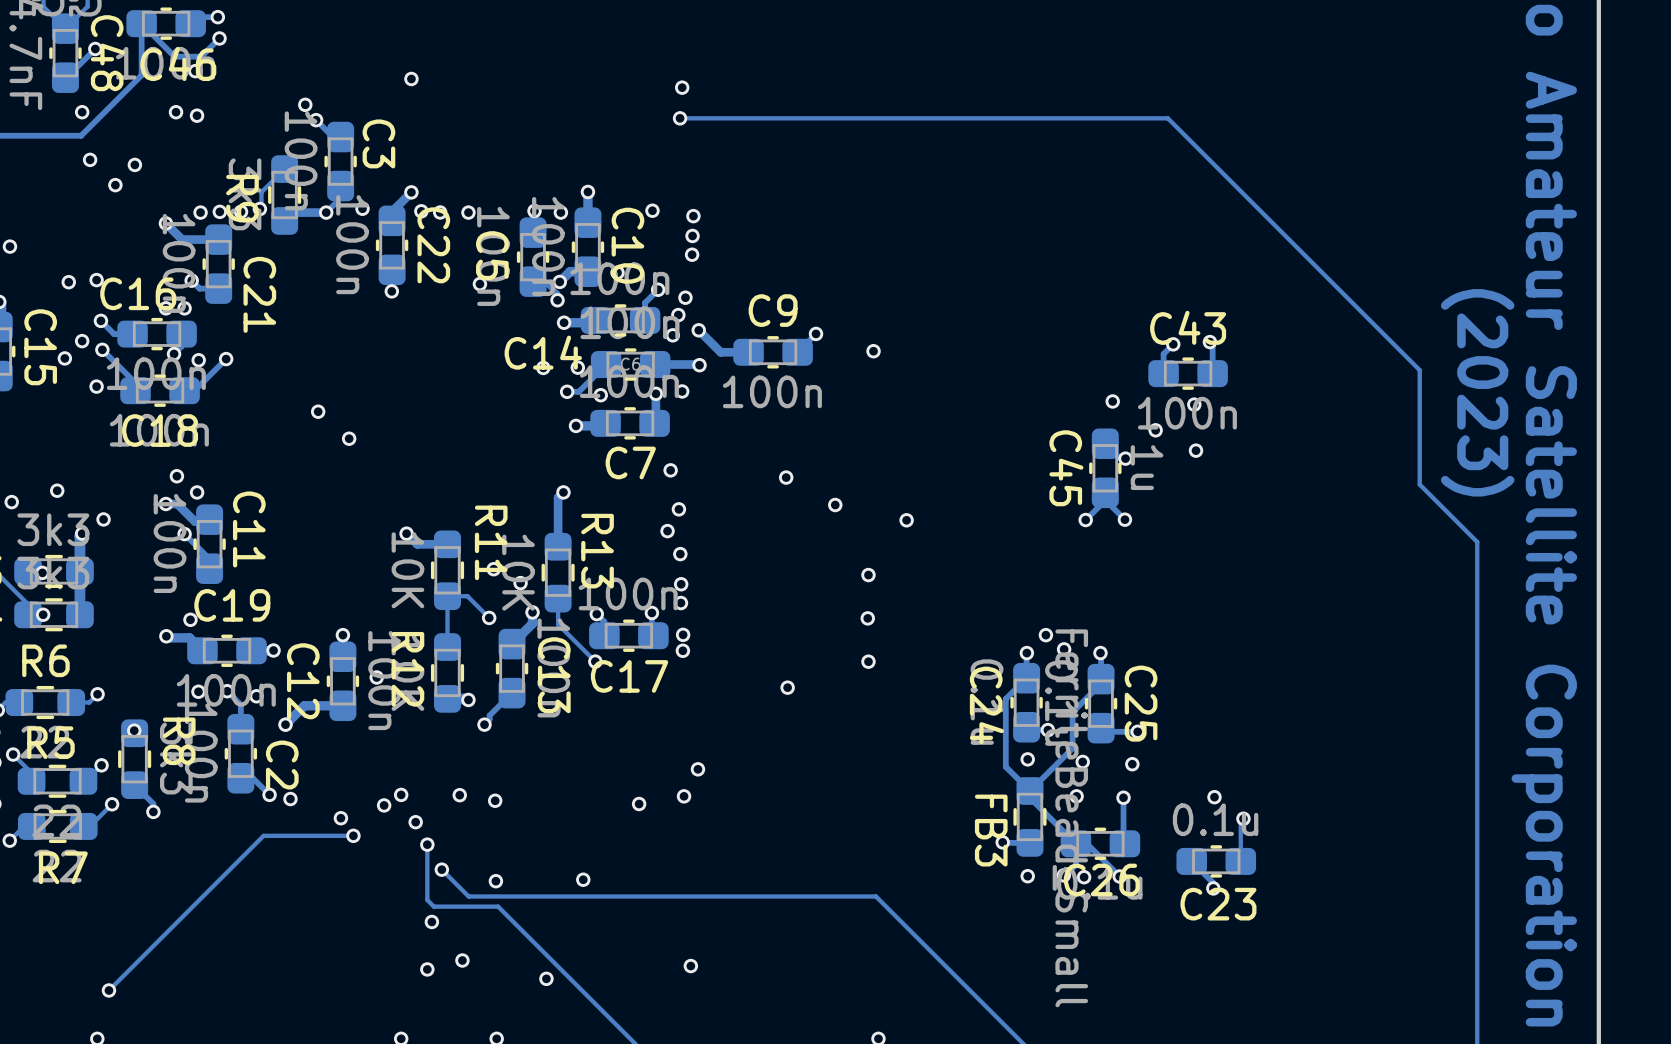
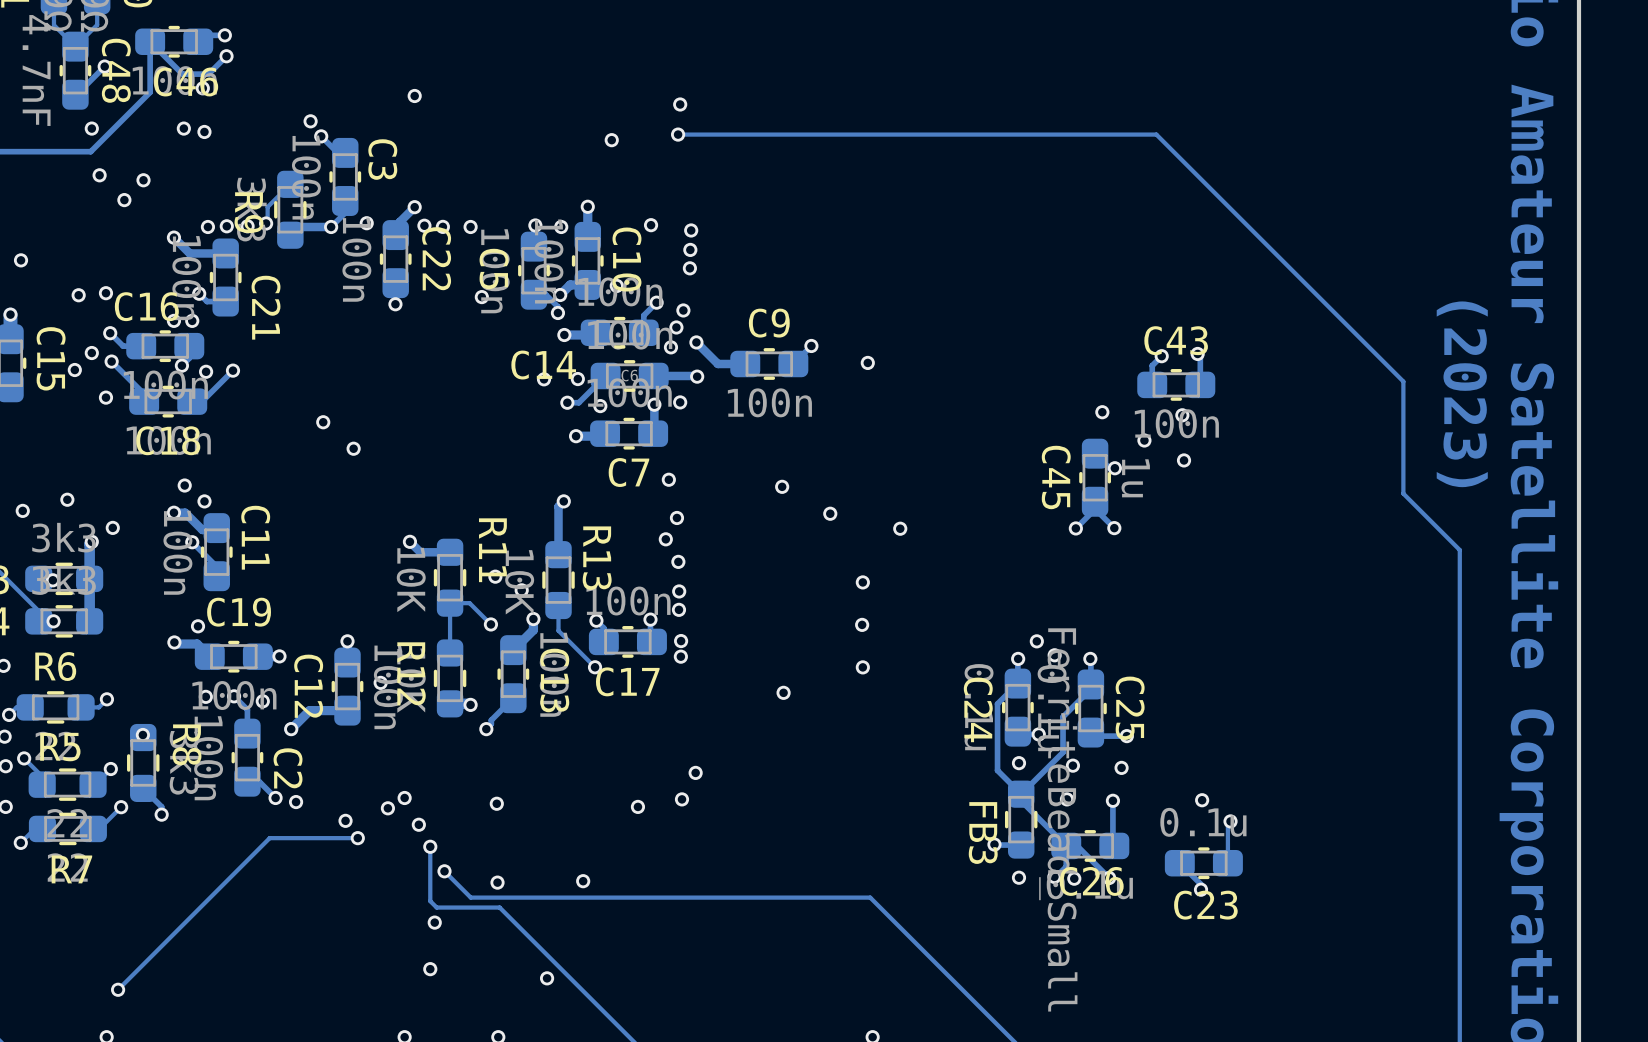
via: none -> (611, 140)
via: (459, 795) -> none
via: (462, 960) -> none
via: (690, 966) -> none

